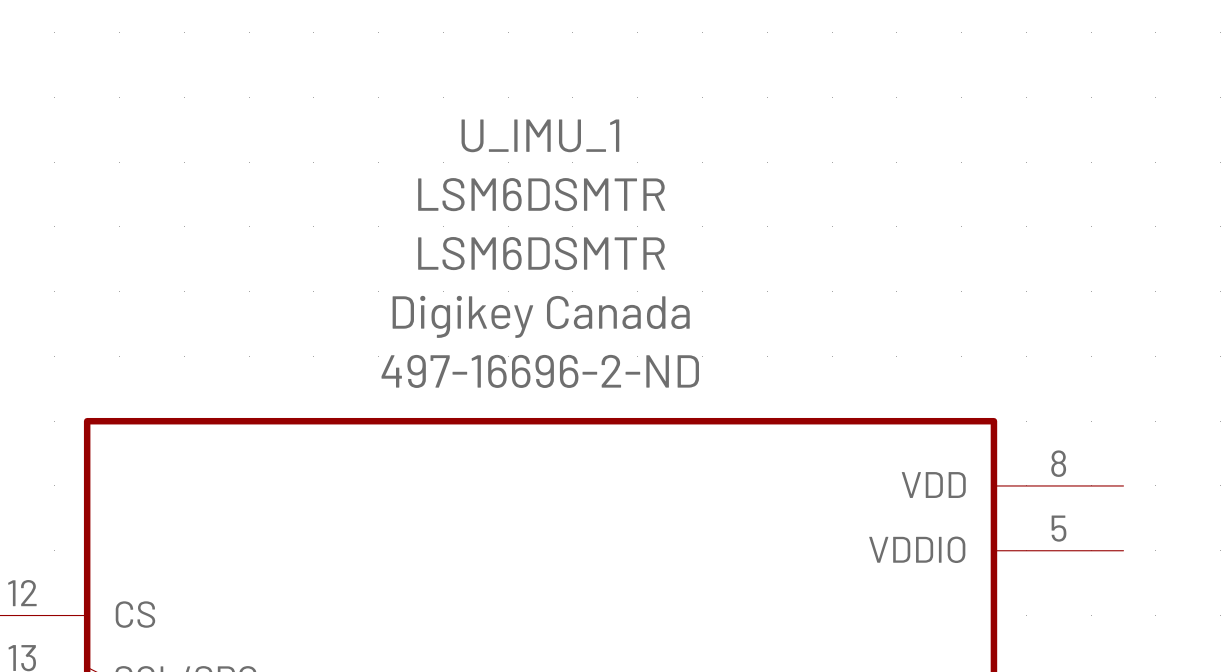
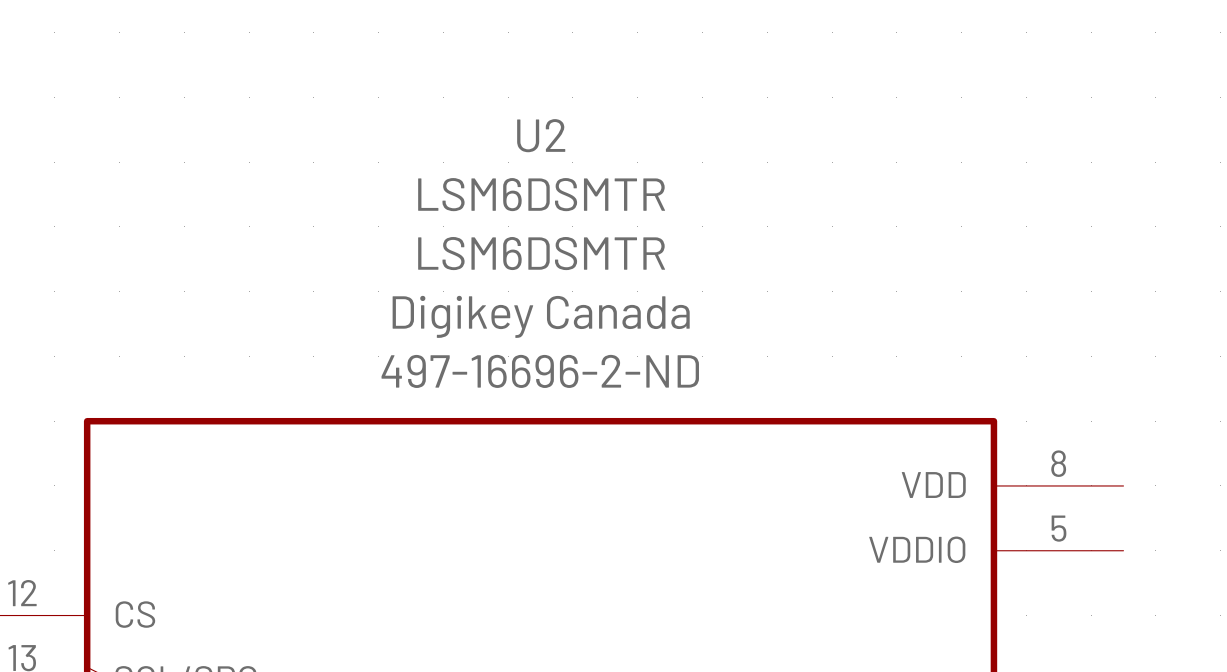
U_IMU_1 name: U_IMU_1 (540, 135) -> U2 (541, 135)

